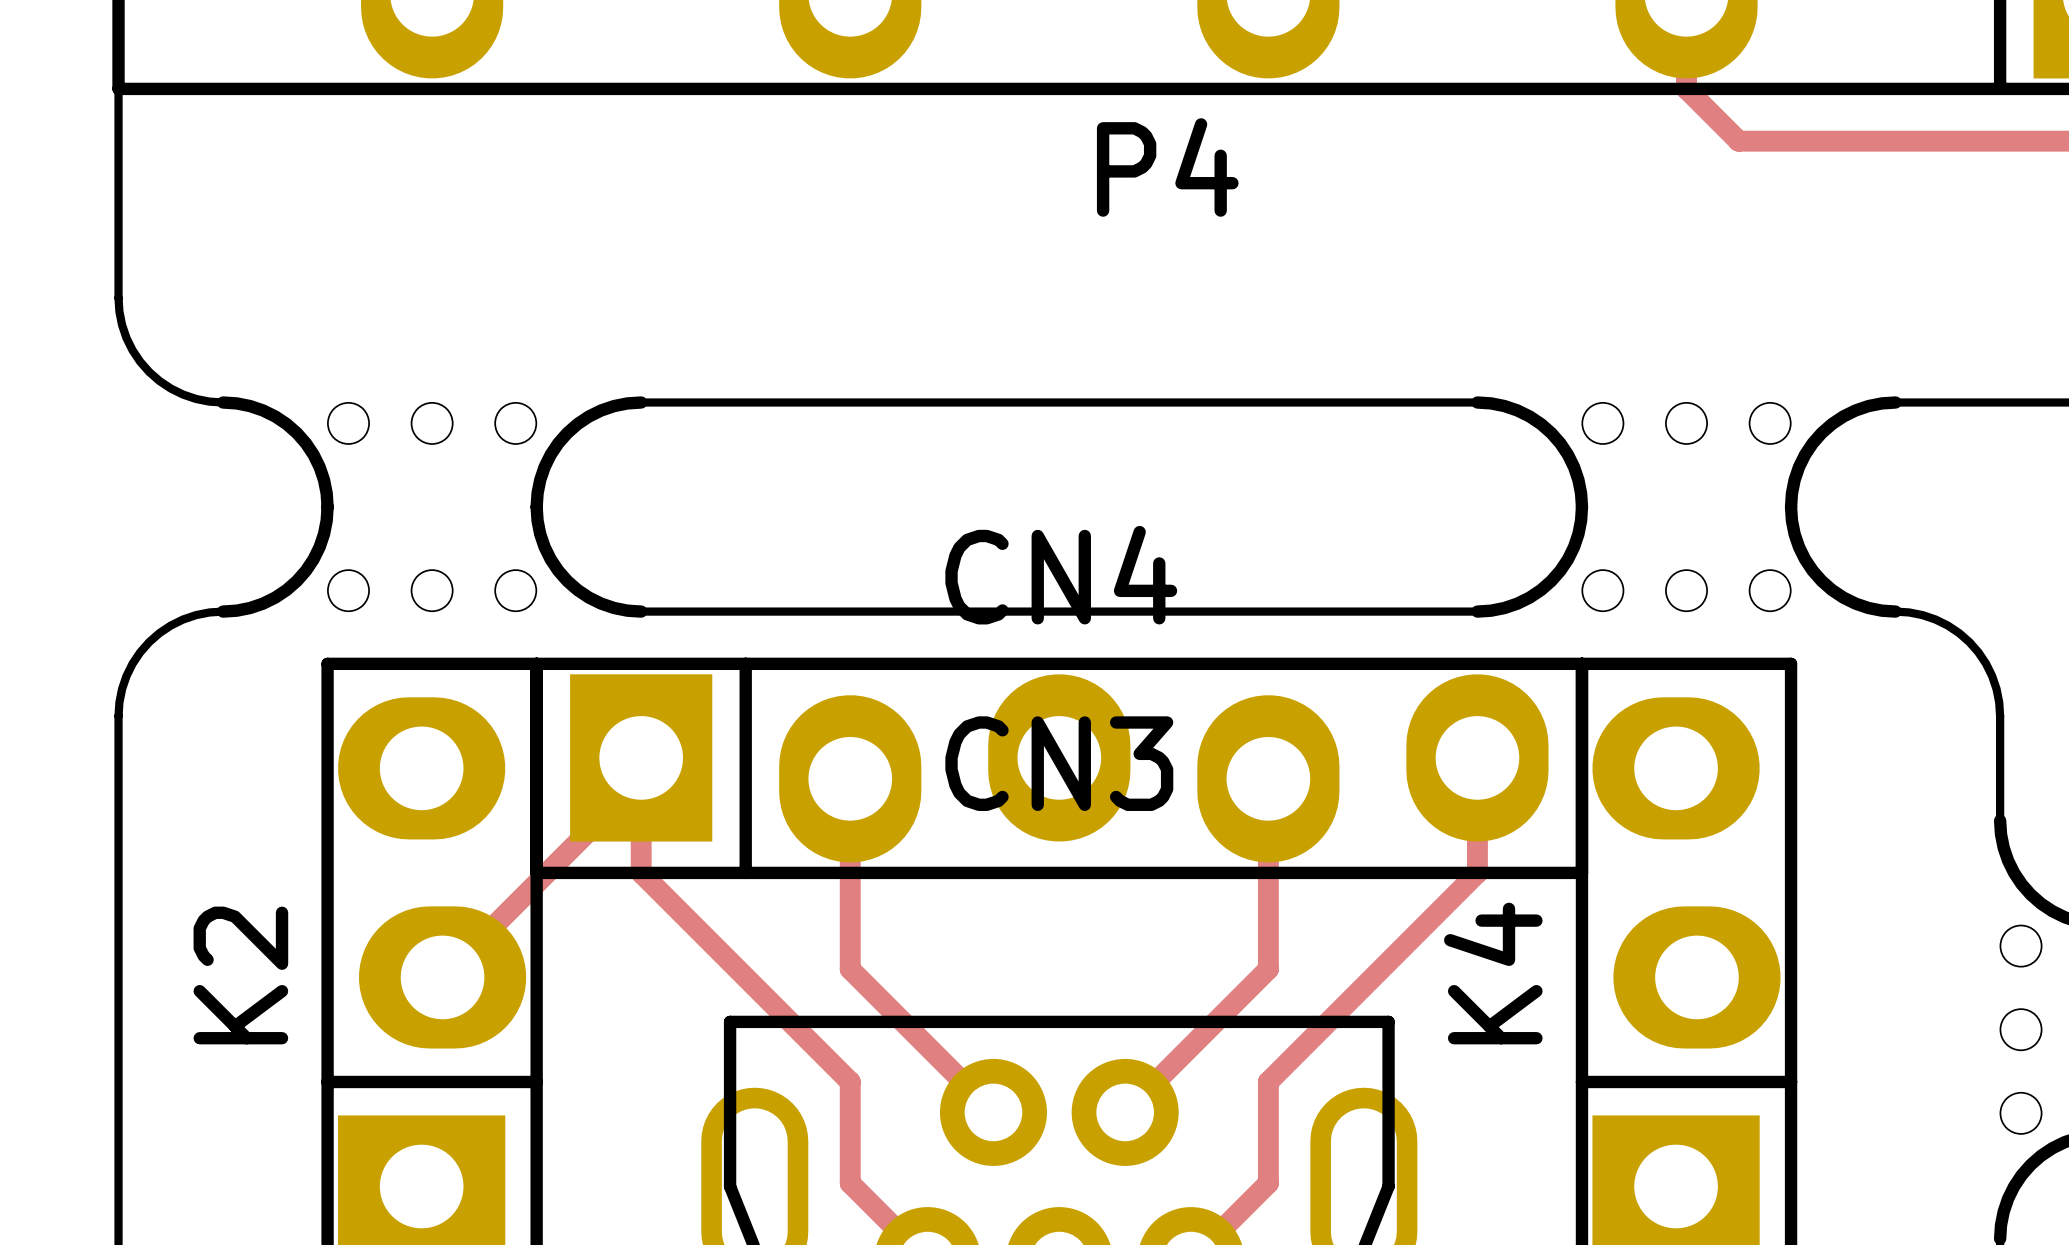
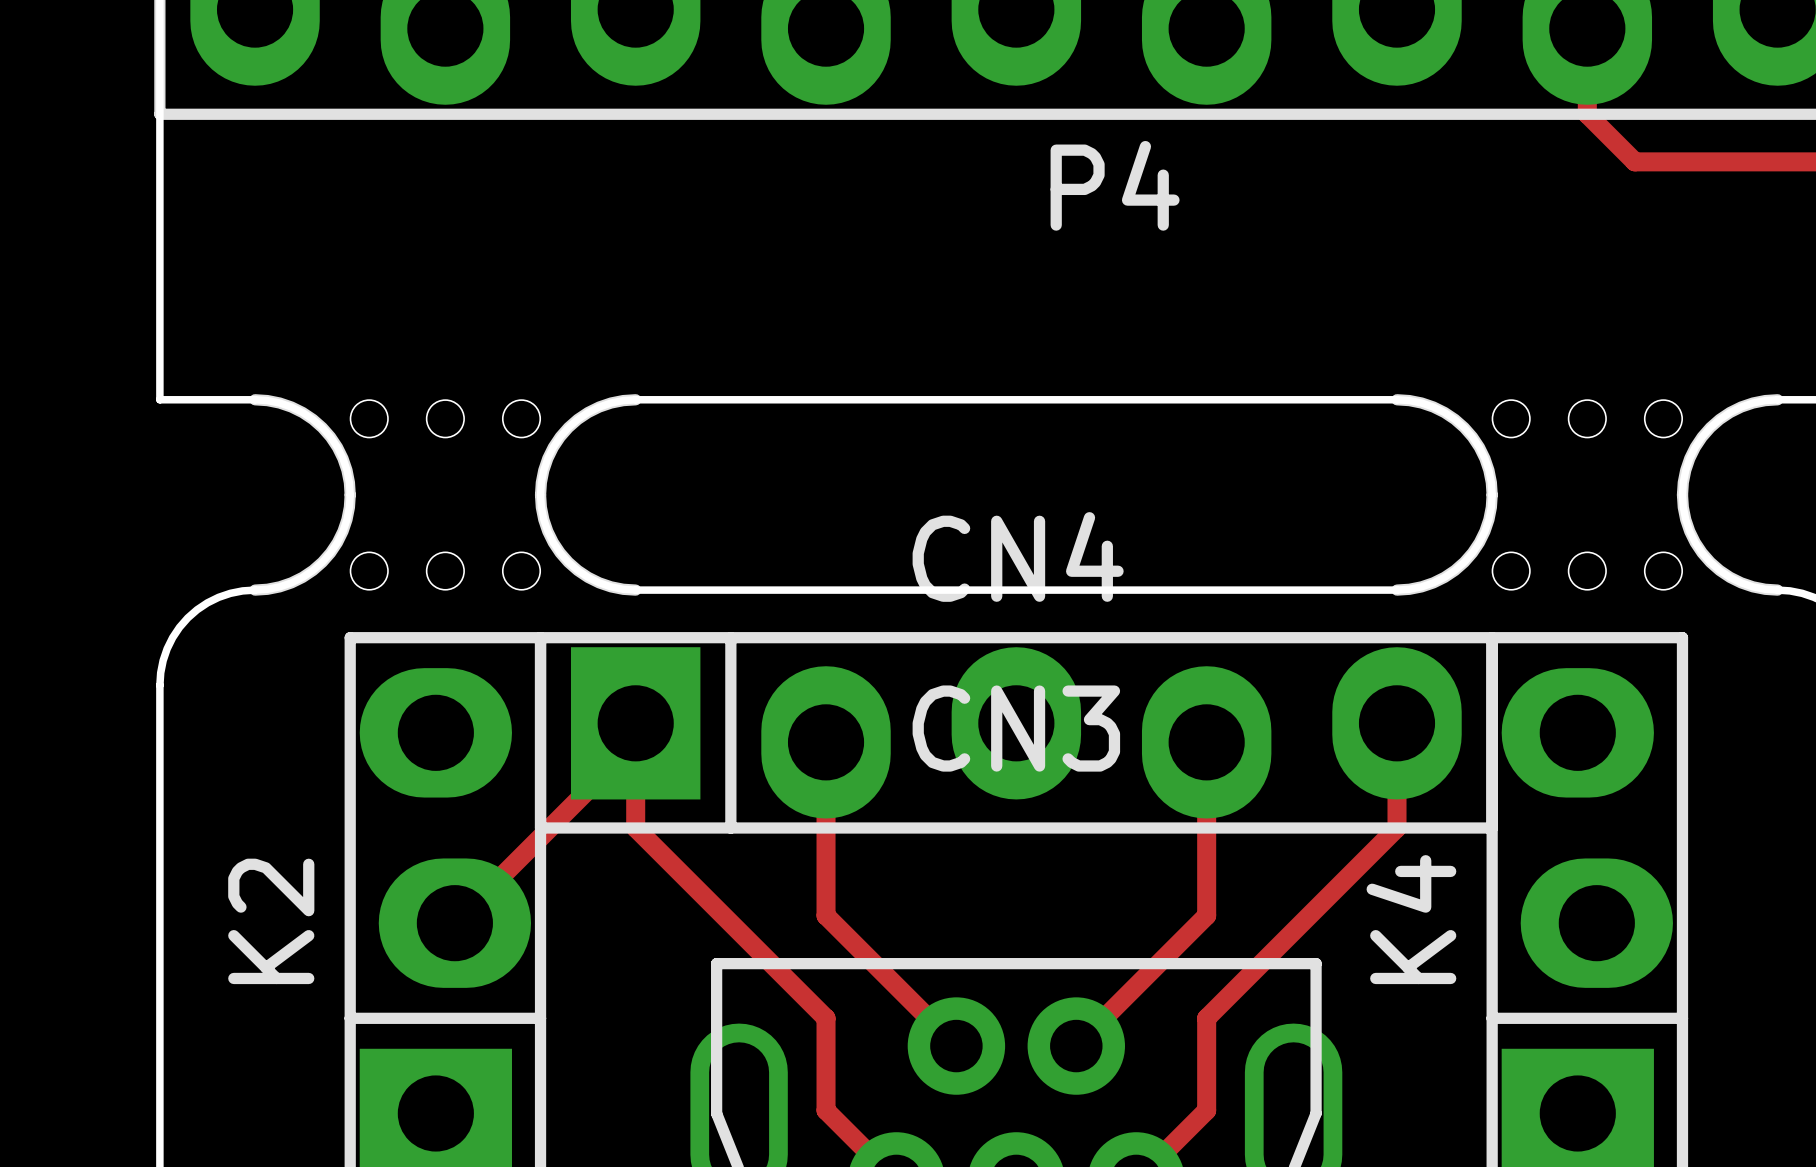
board edge: (118, 297) (119, 311) (126, 337) (132, 350) (149, 371) (159, 380) (183, 394) (195, 398) (223, 402) -> (159, 304) (159, 399) (255, 399)

